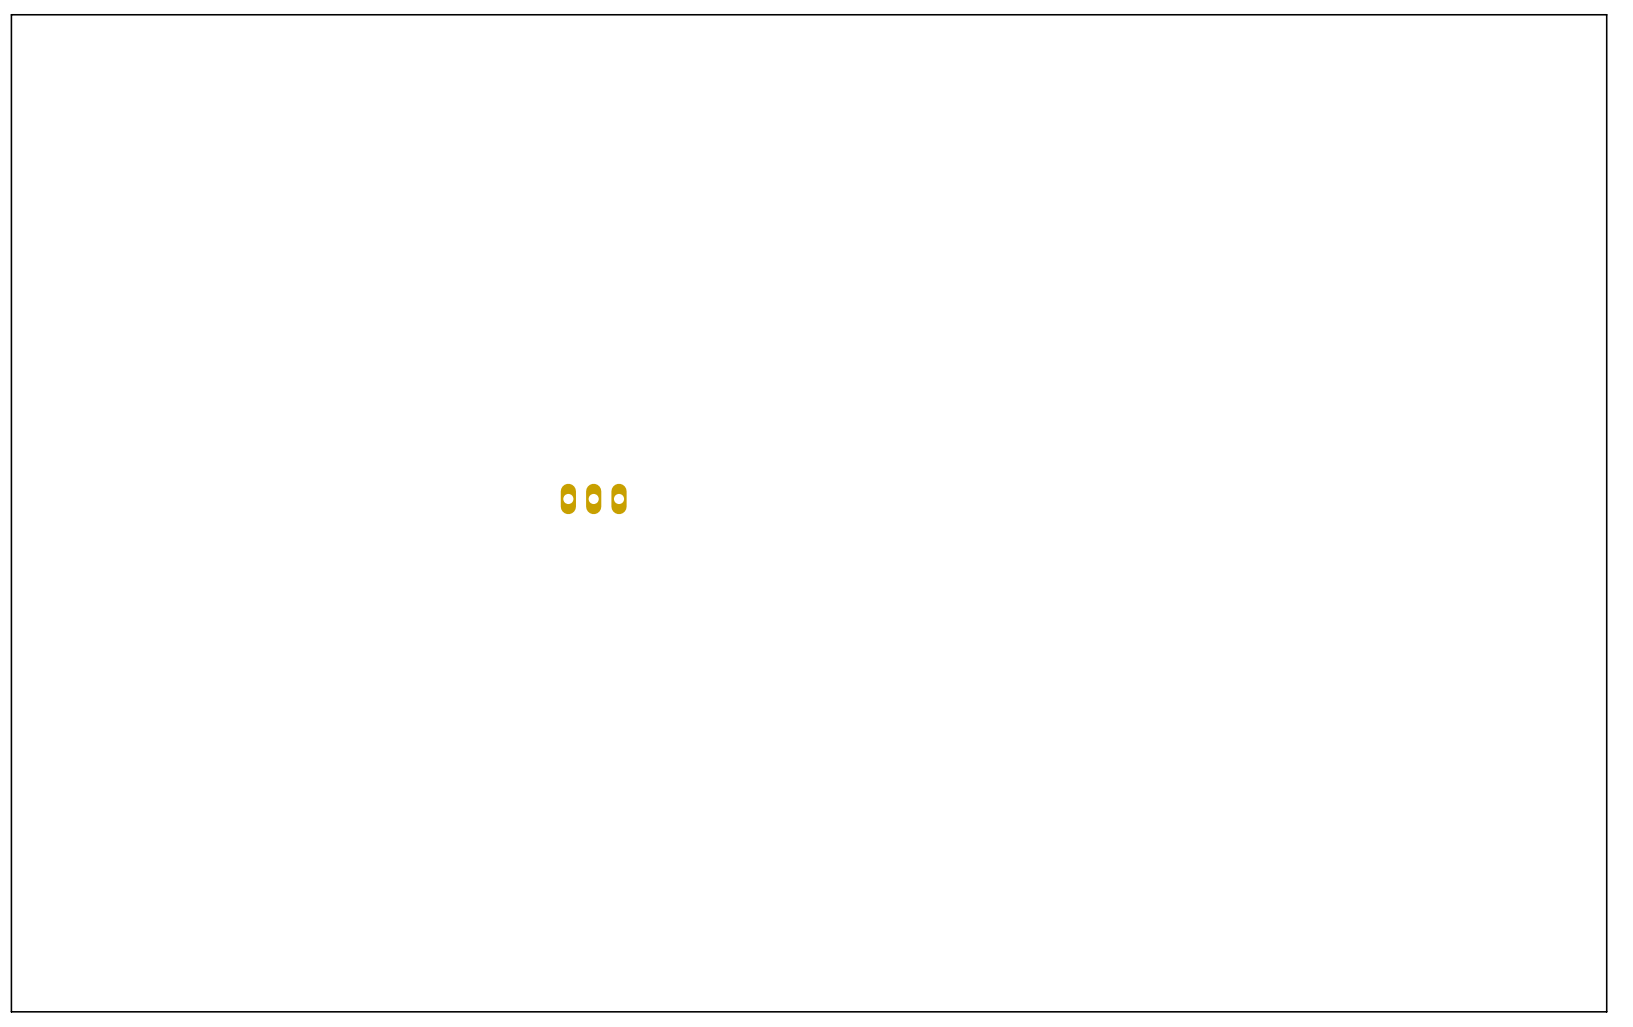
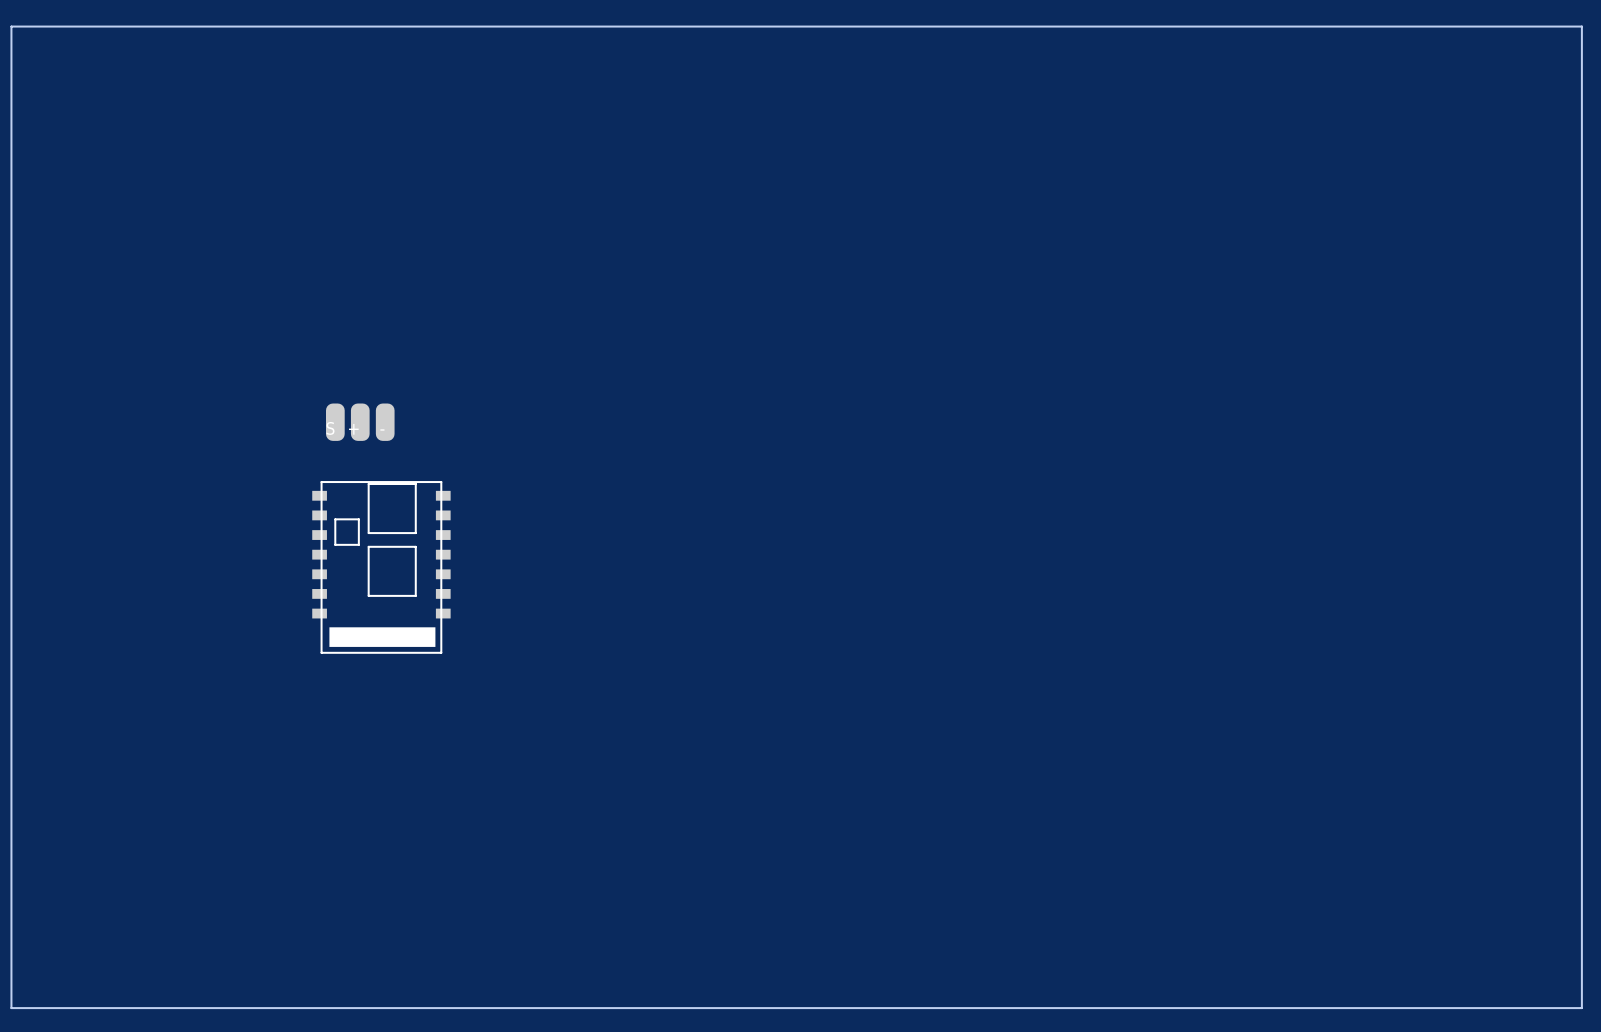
part: none -> (360, 422)
part: (593, 498) -> none
part: none -> (381, 567)

